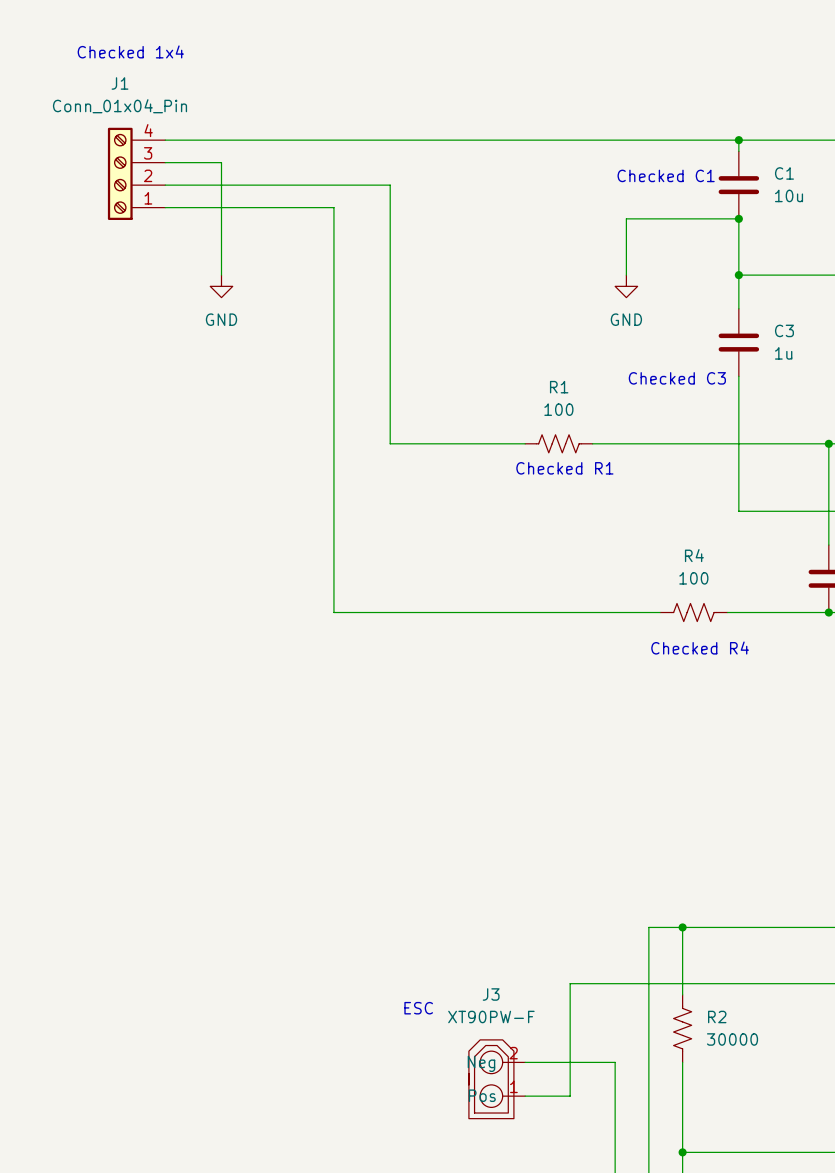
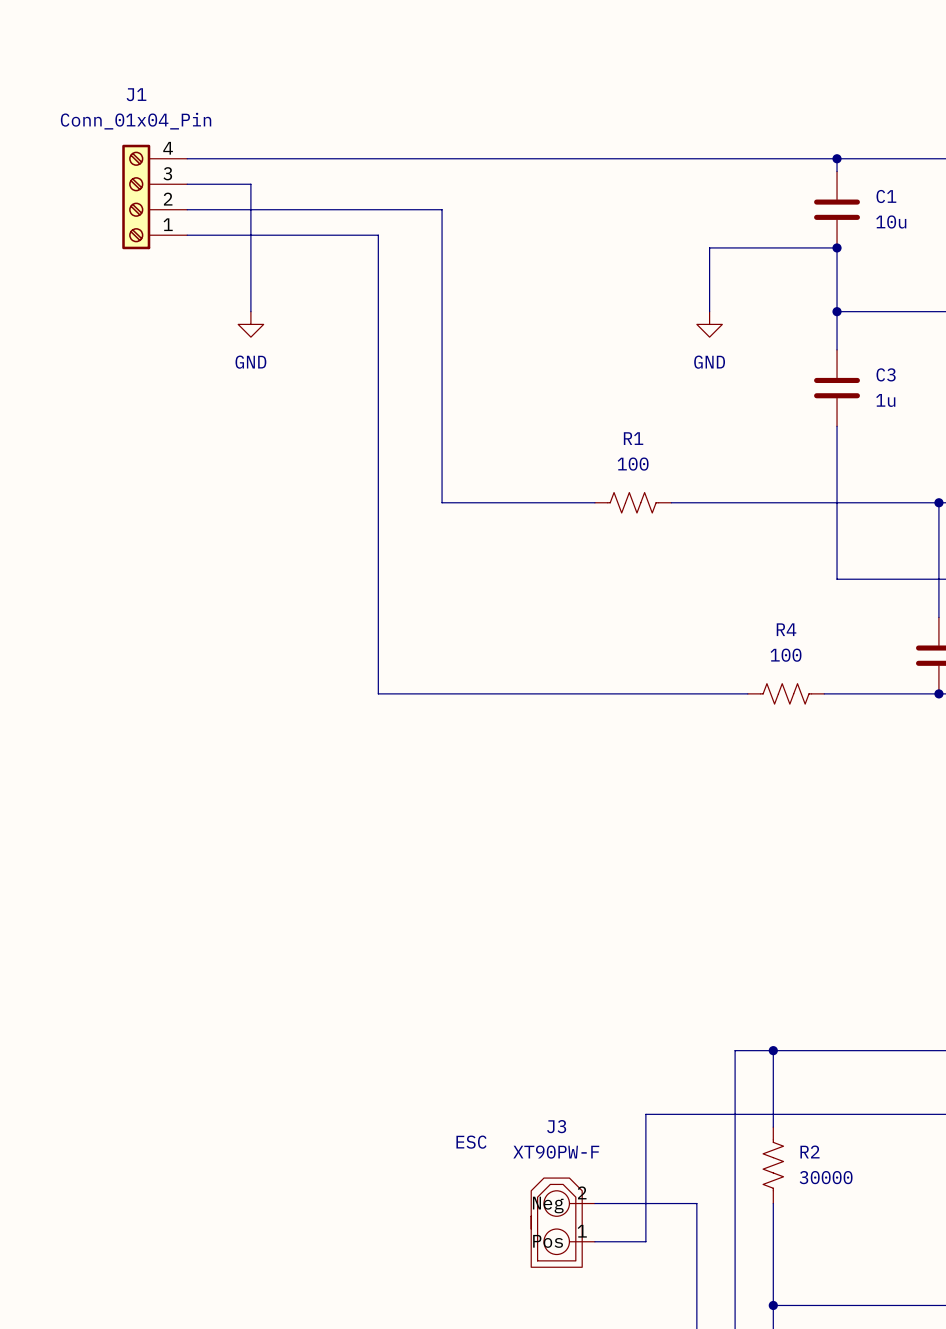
text: Checked 1x4 (130, 51) -> none
text: Checked C1 (666, 175) -> none
text: Checked C3 (677, 378) -> none
text: Checked R1 (564, 468) -> none
text: Checked R4 (700, 648) -> none

